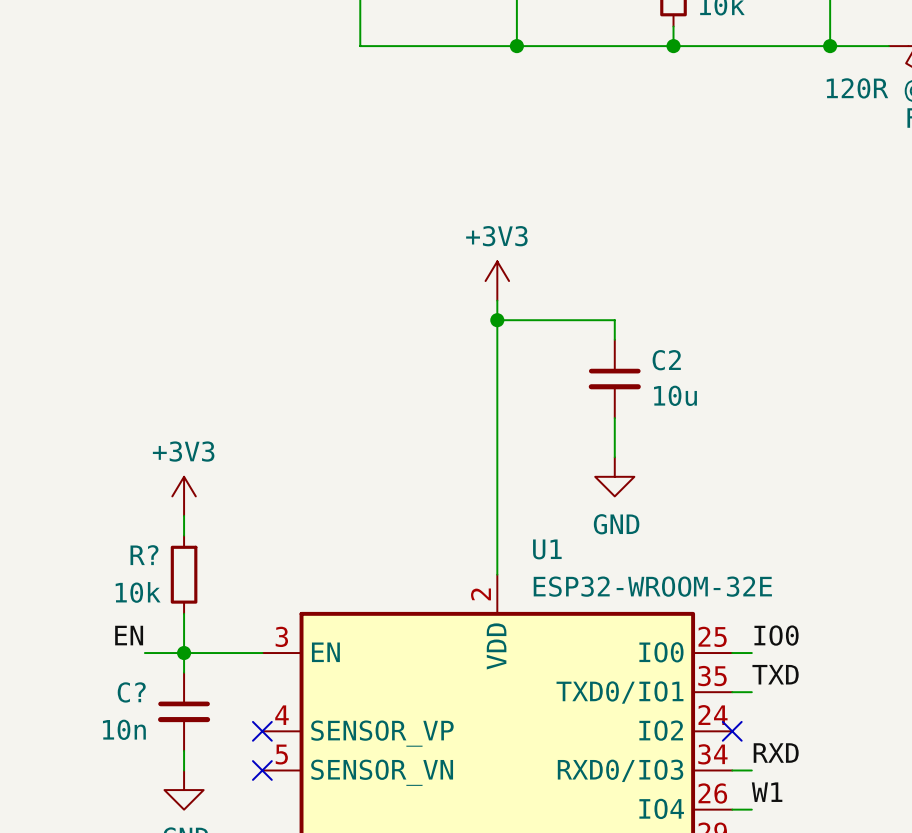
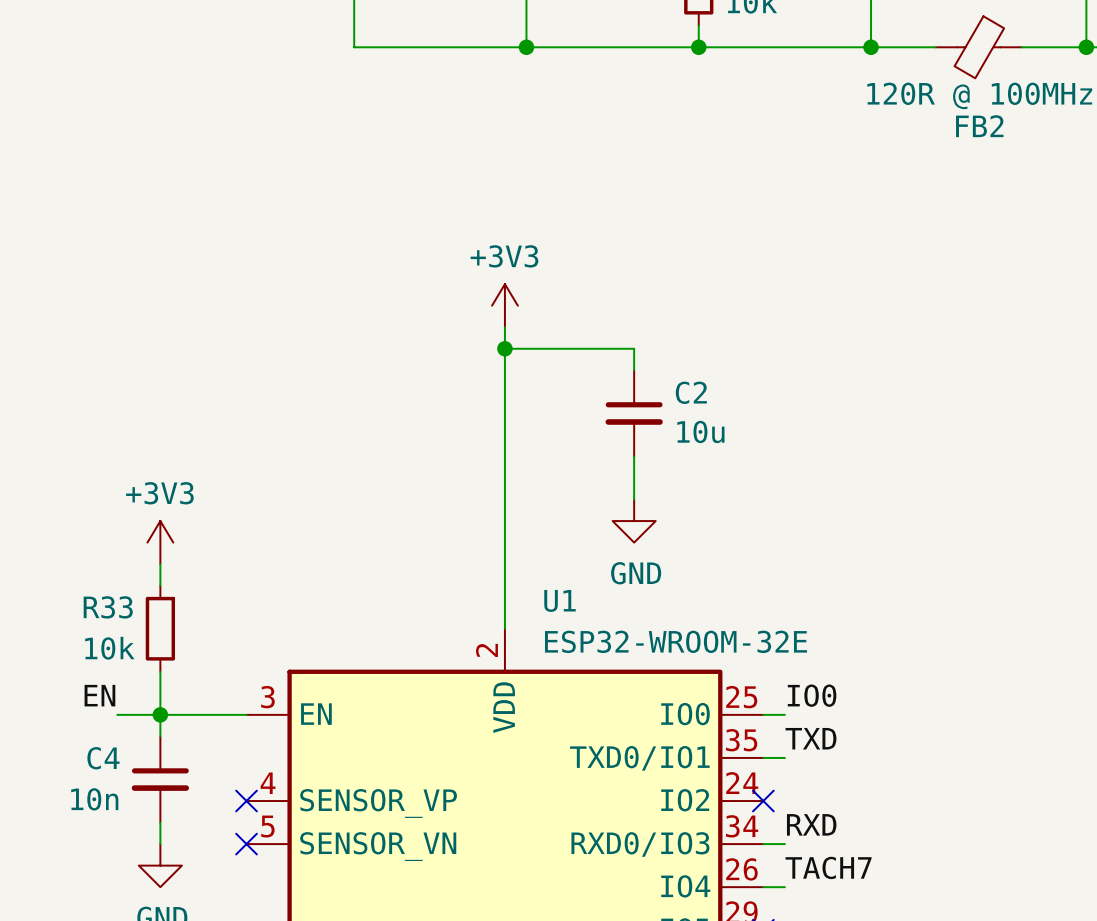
R? name: R? (144, 555) -> R33 (108, 607)
C? name: C? (131, 692) -> C4 (103, 758)
label: W1 (767, 792) -> TACH7 (828, 867)

